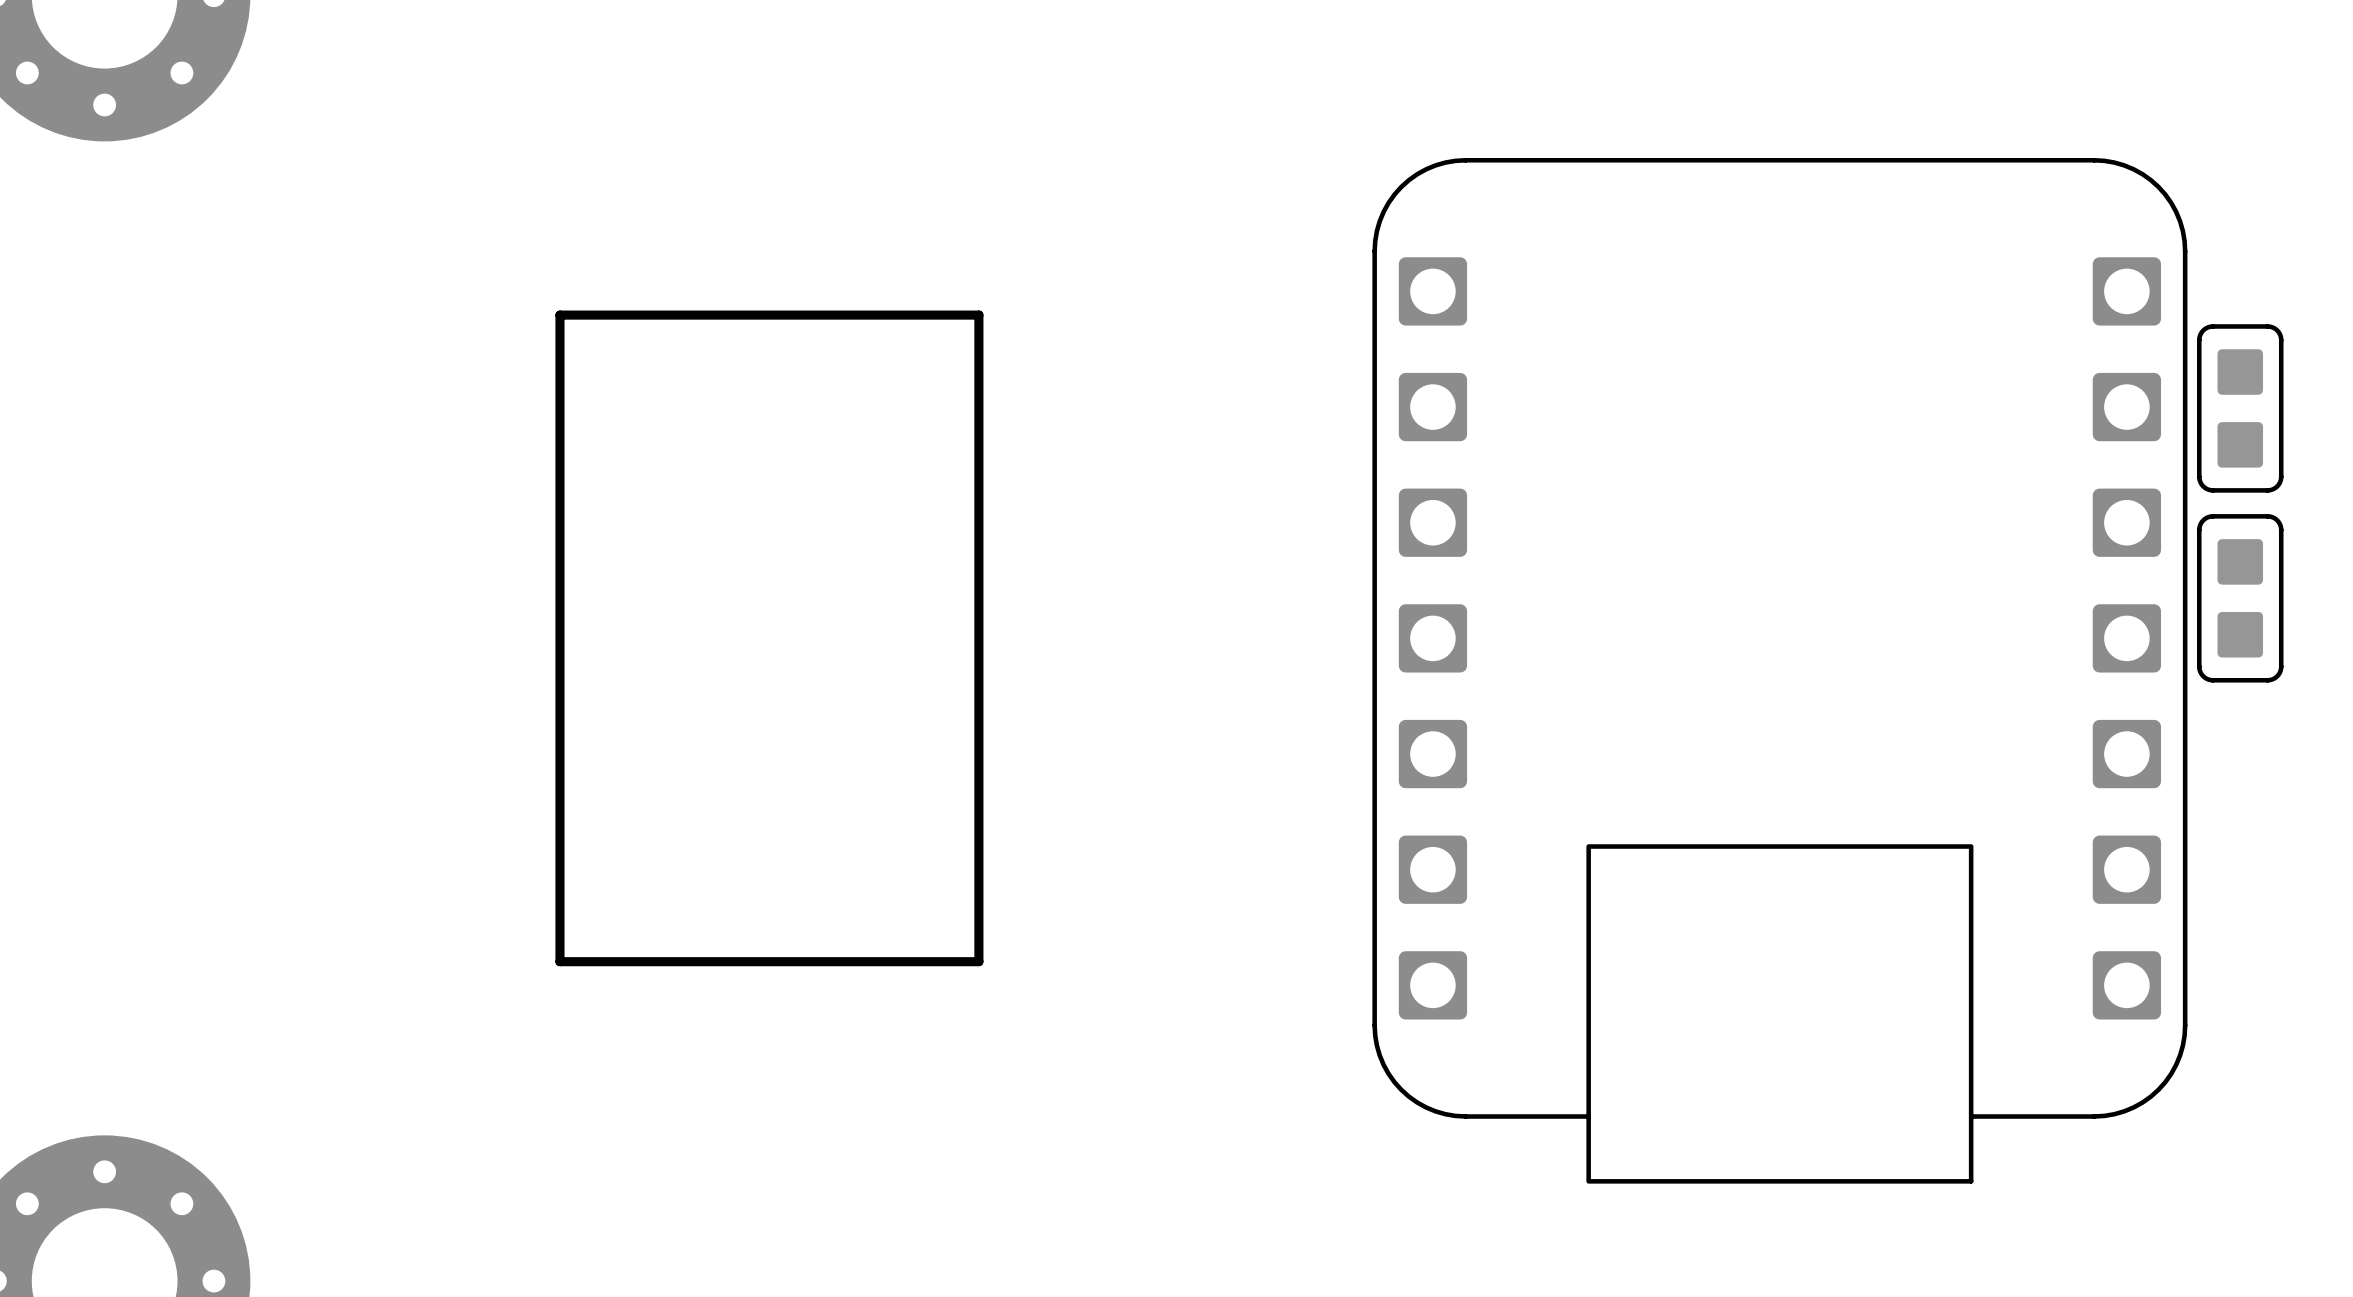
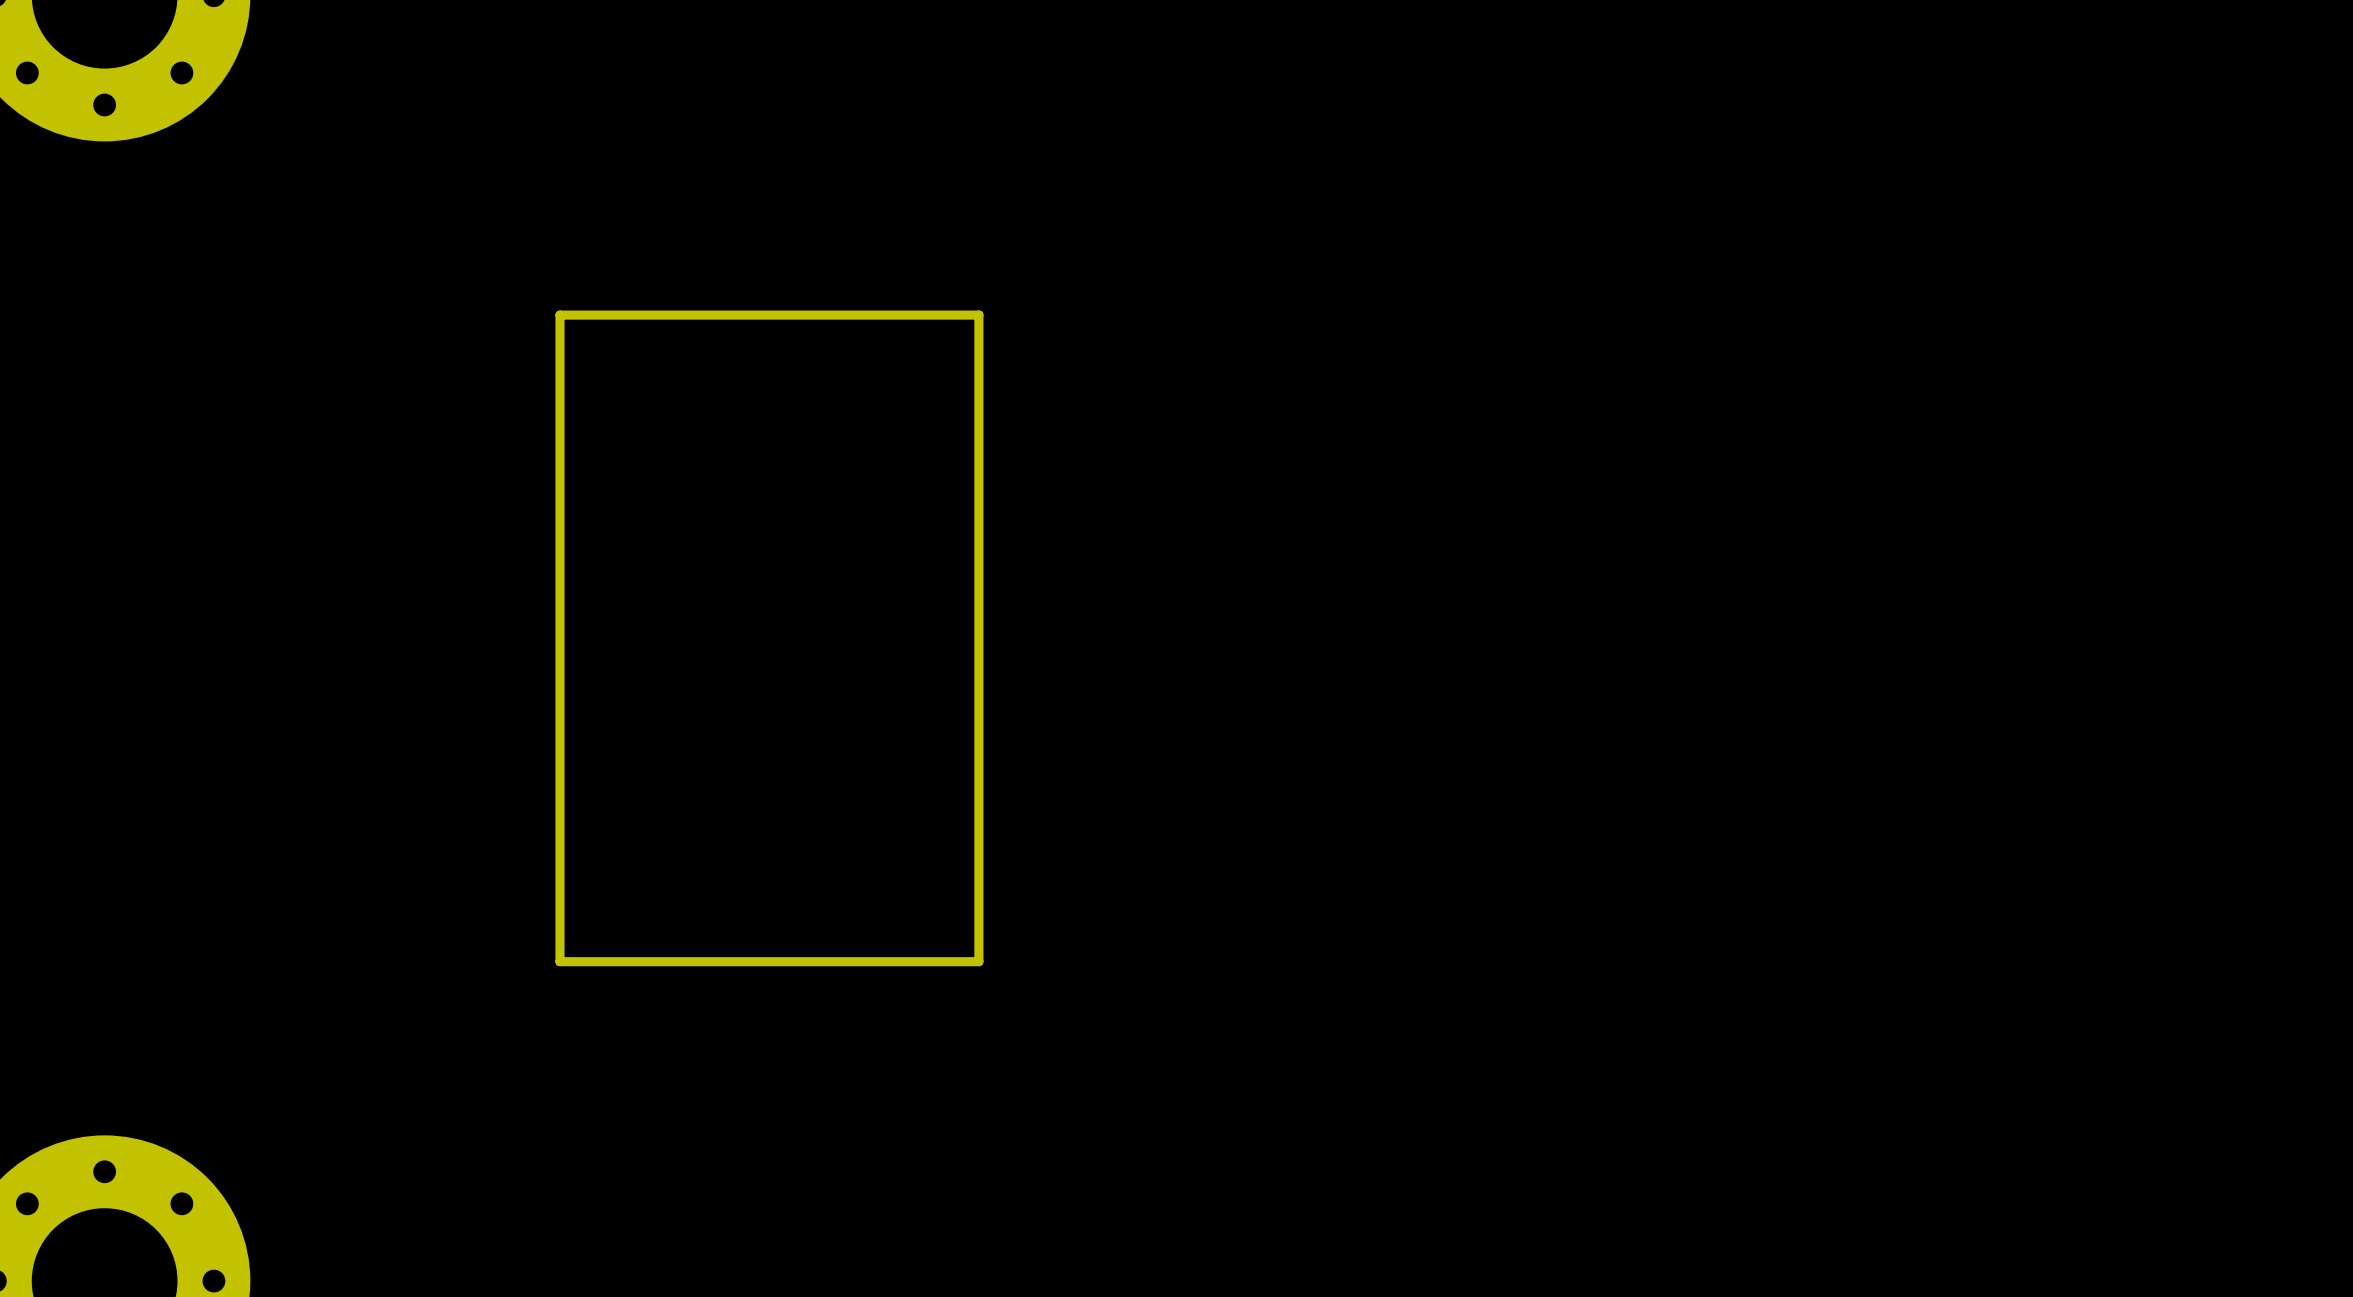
part: (2240, 408) -> none
part: (2240, 598) -> none
part: (1779, 670) -> none

